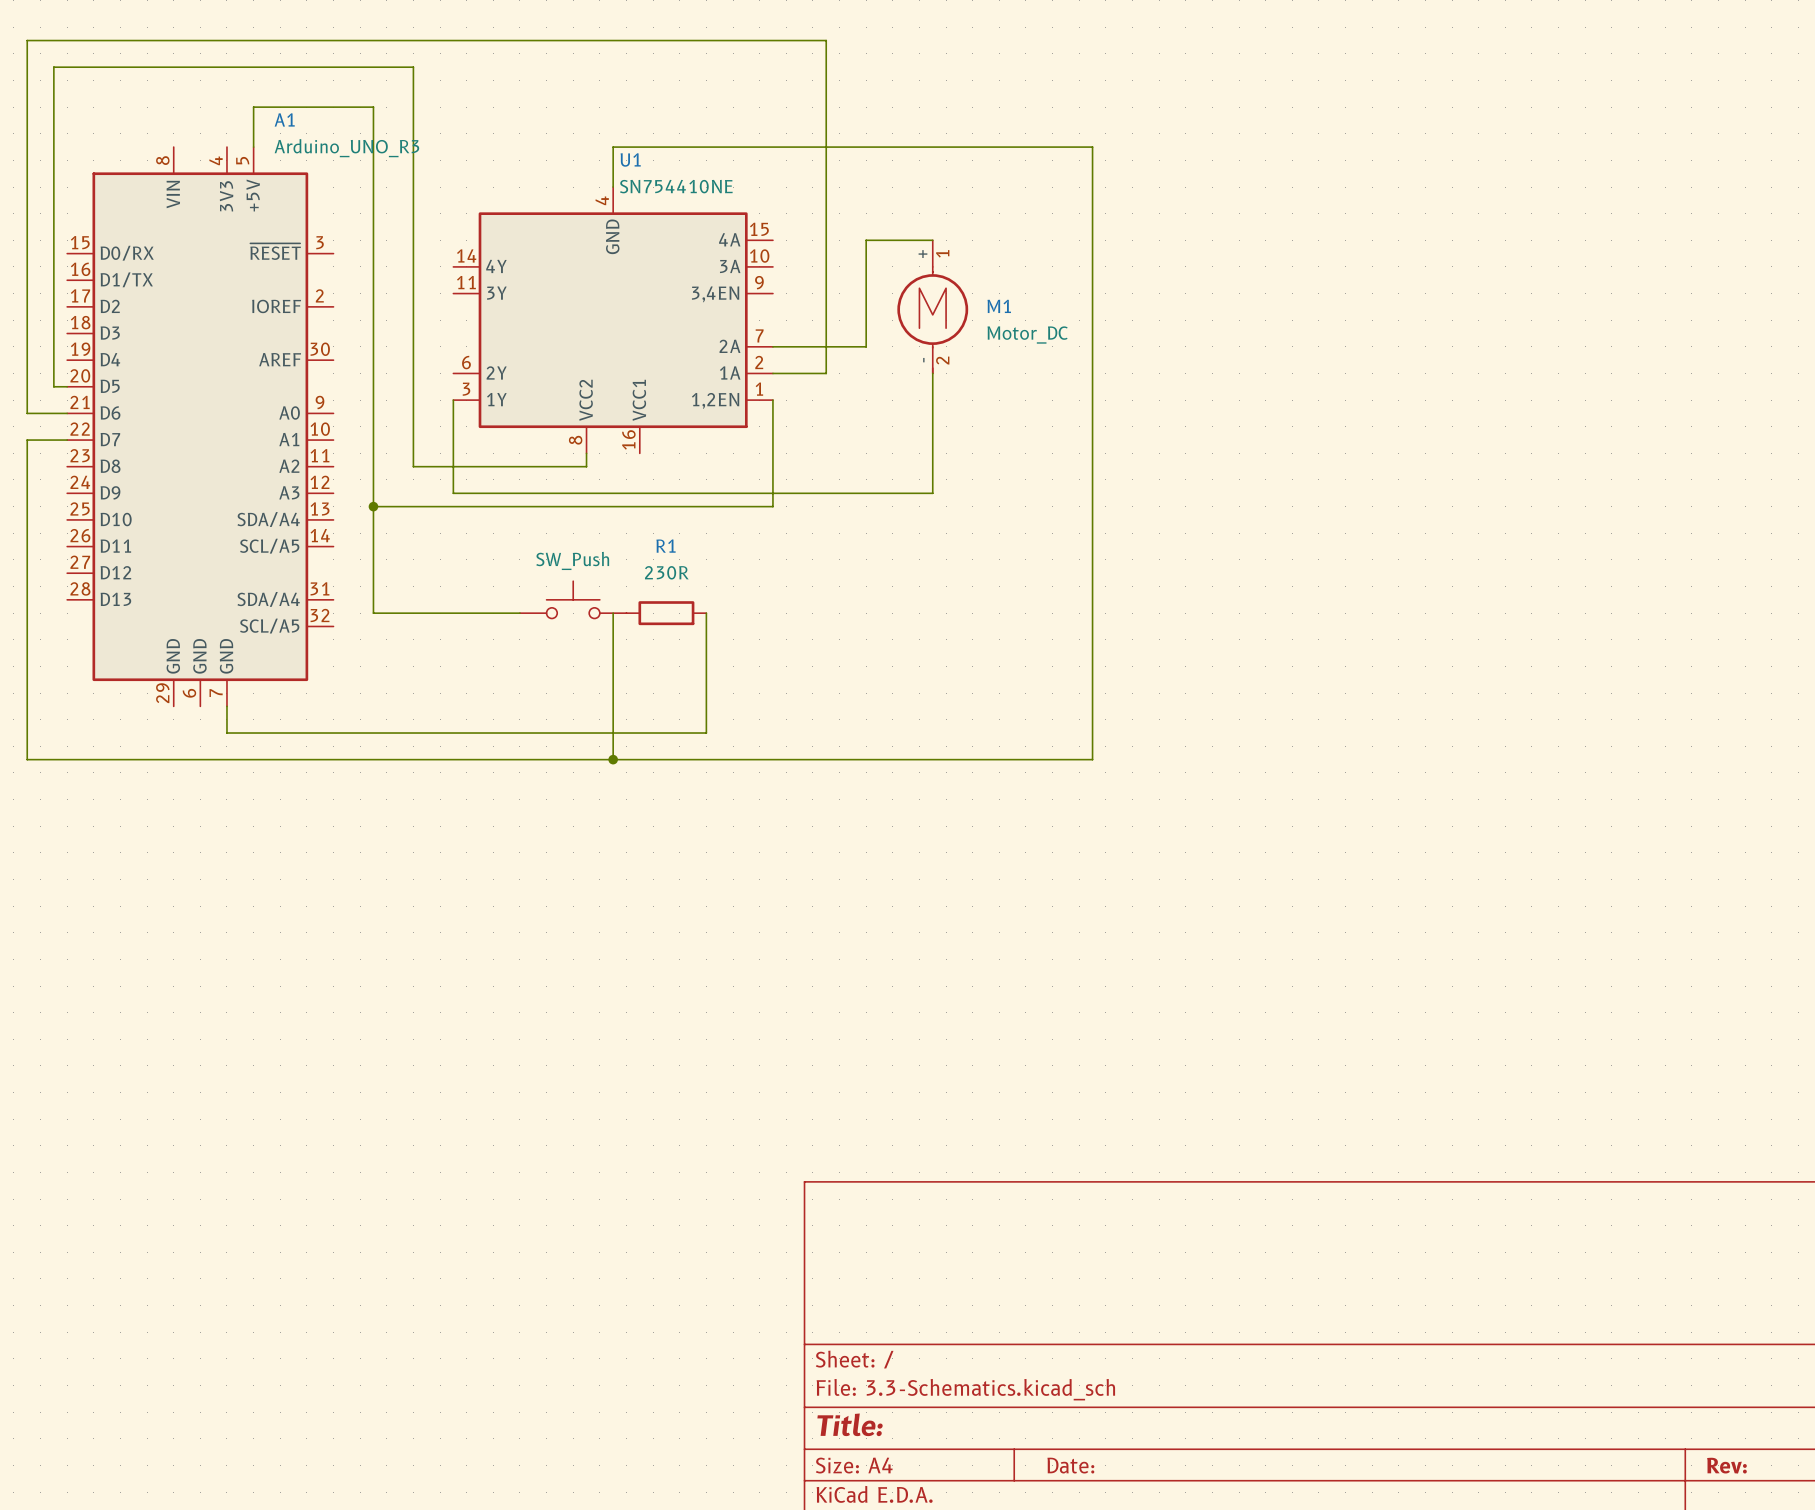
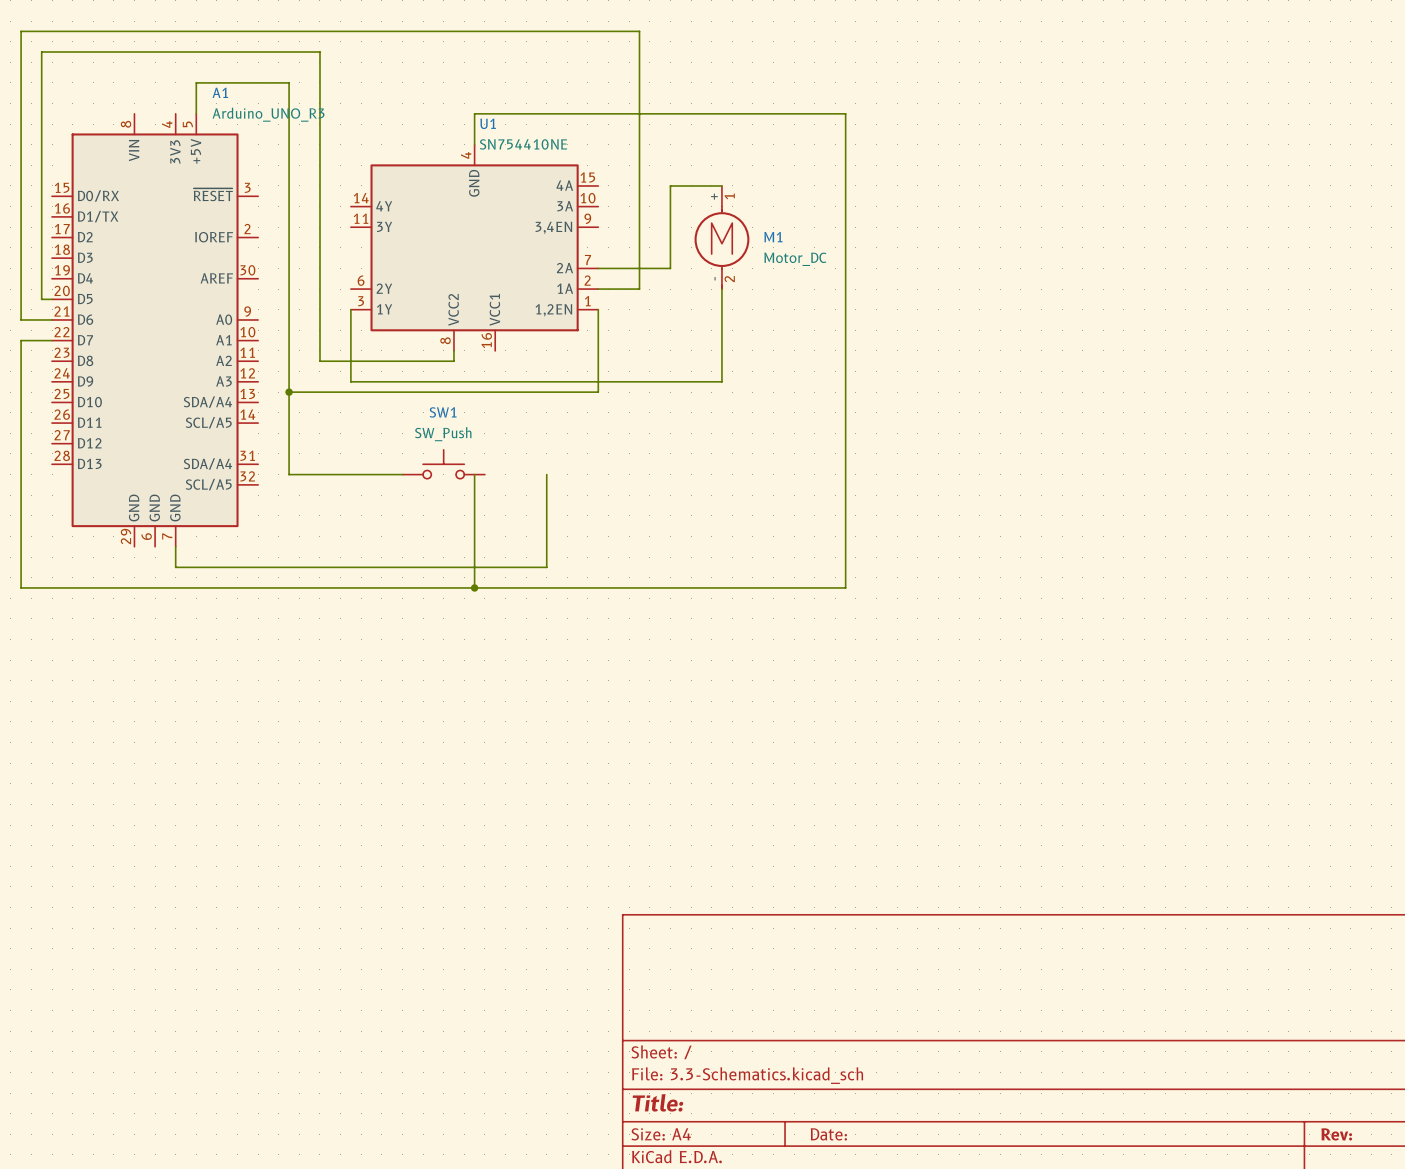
SW1 name: none -> SW1 (443, 412)
R1: 230R (666, 613) -> none

